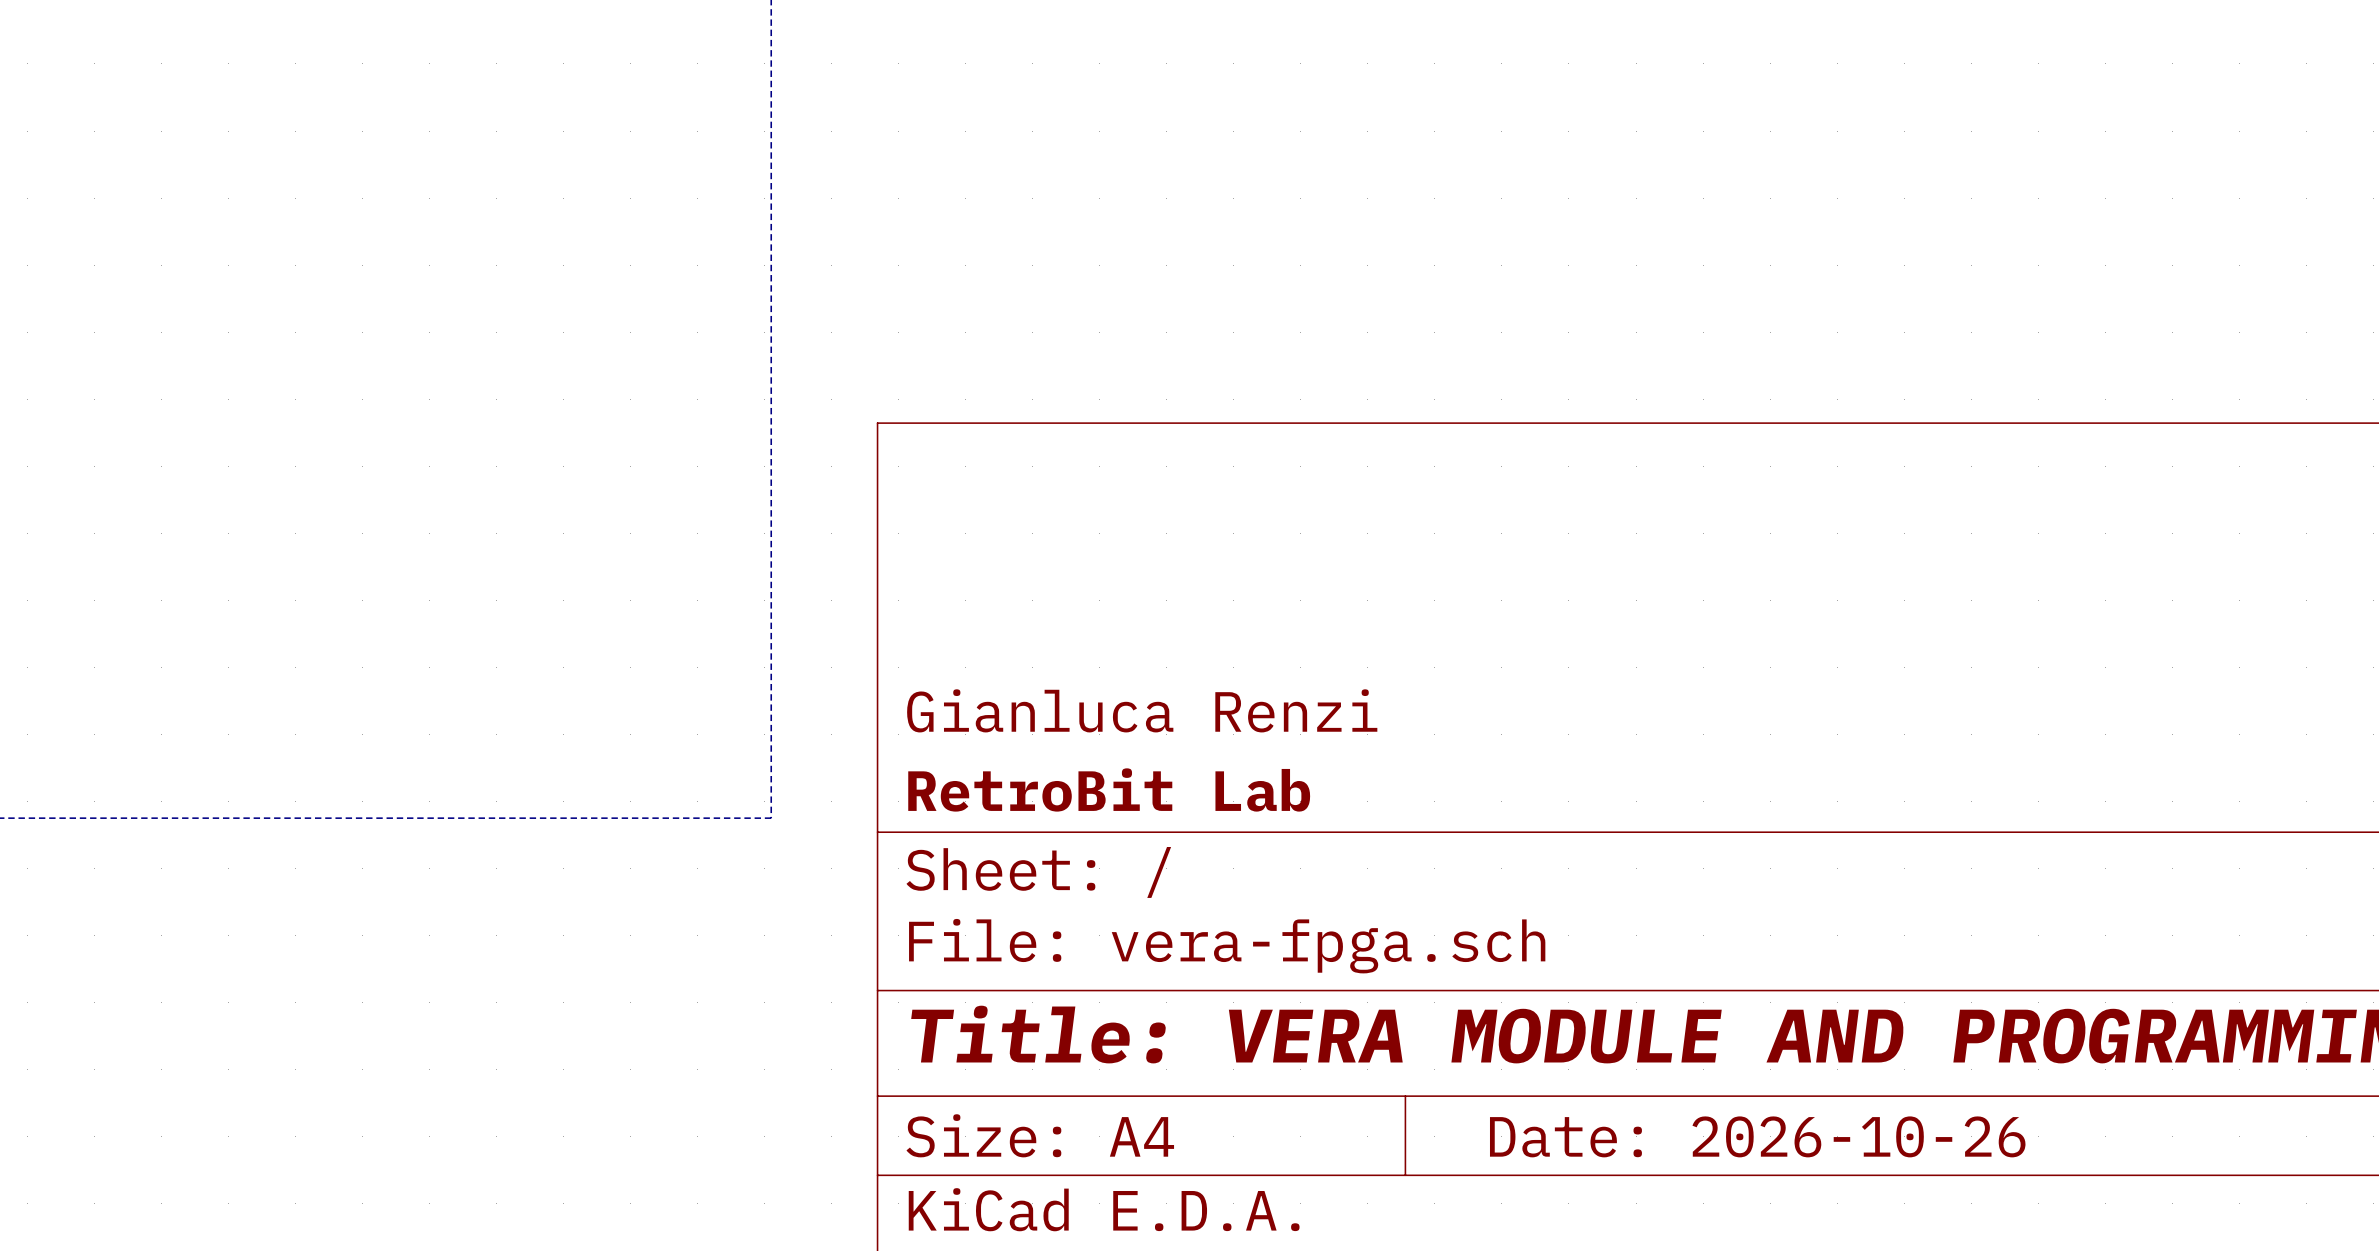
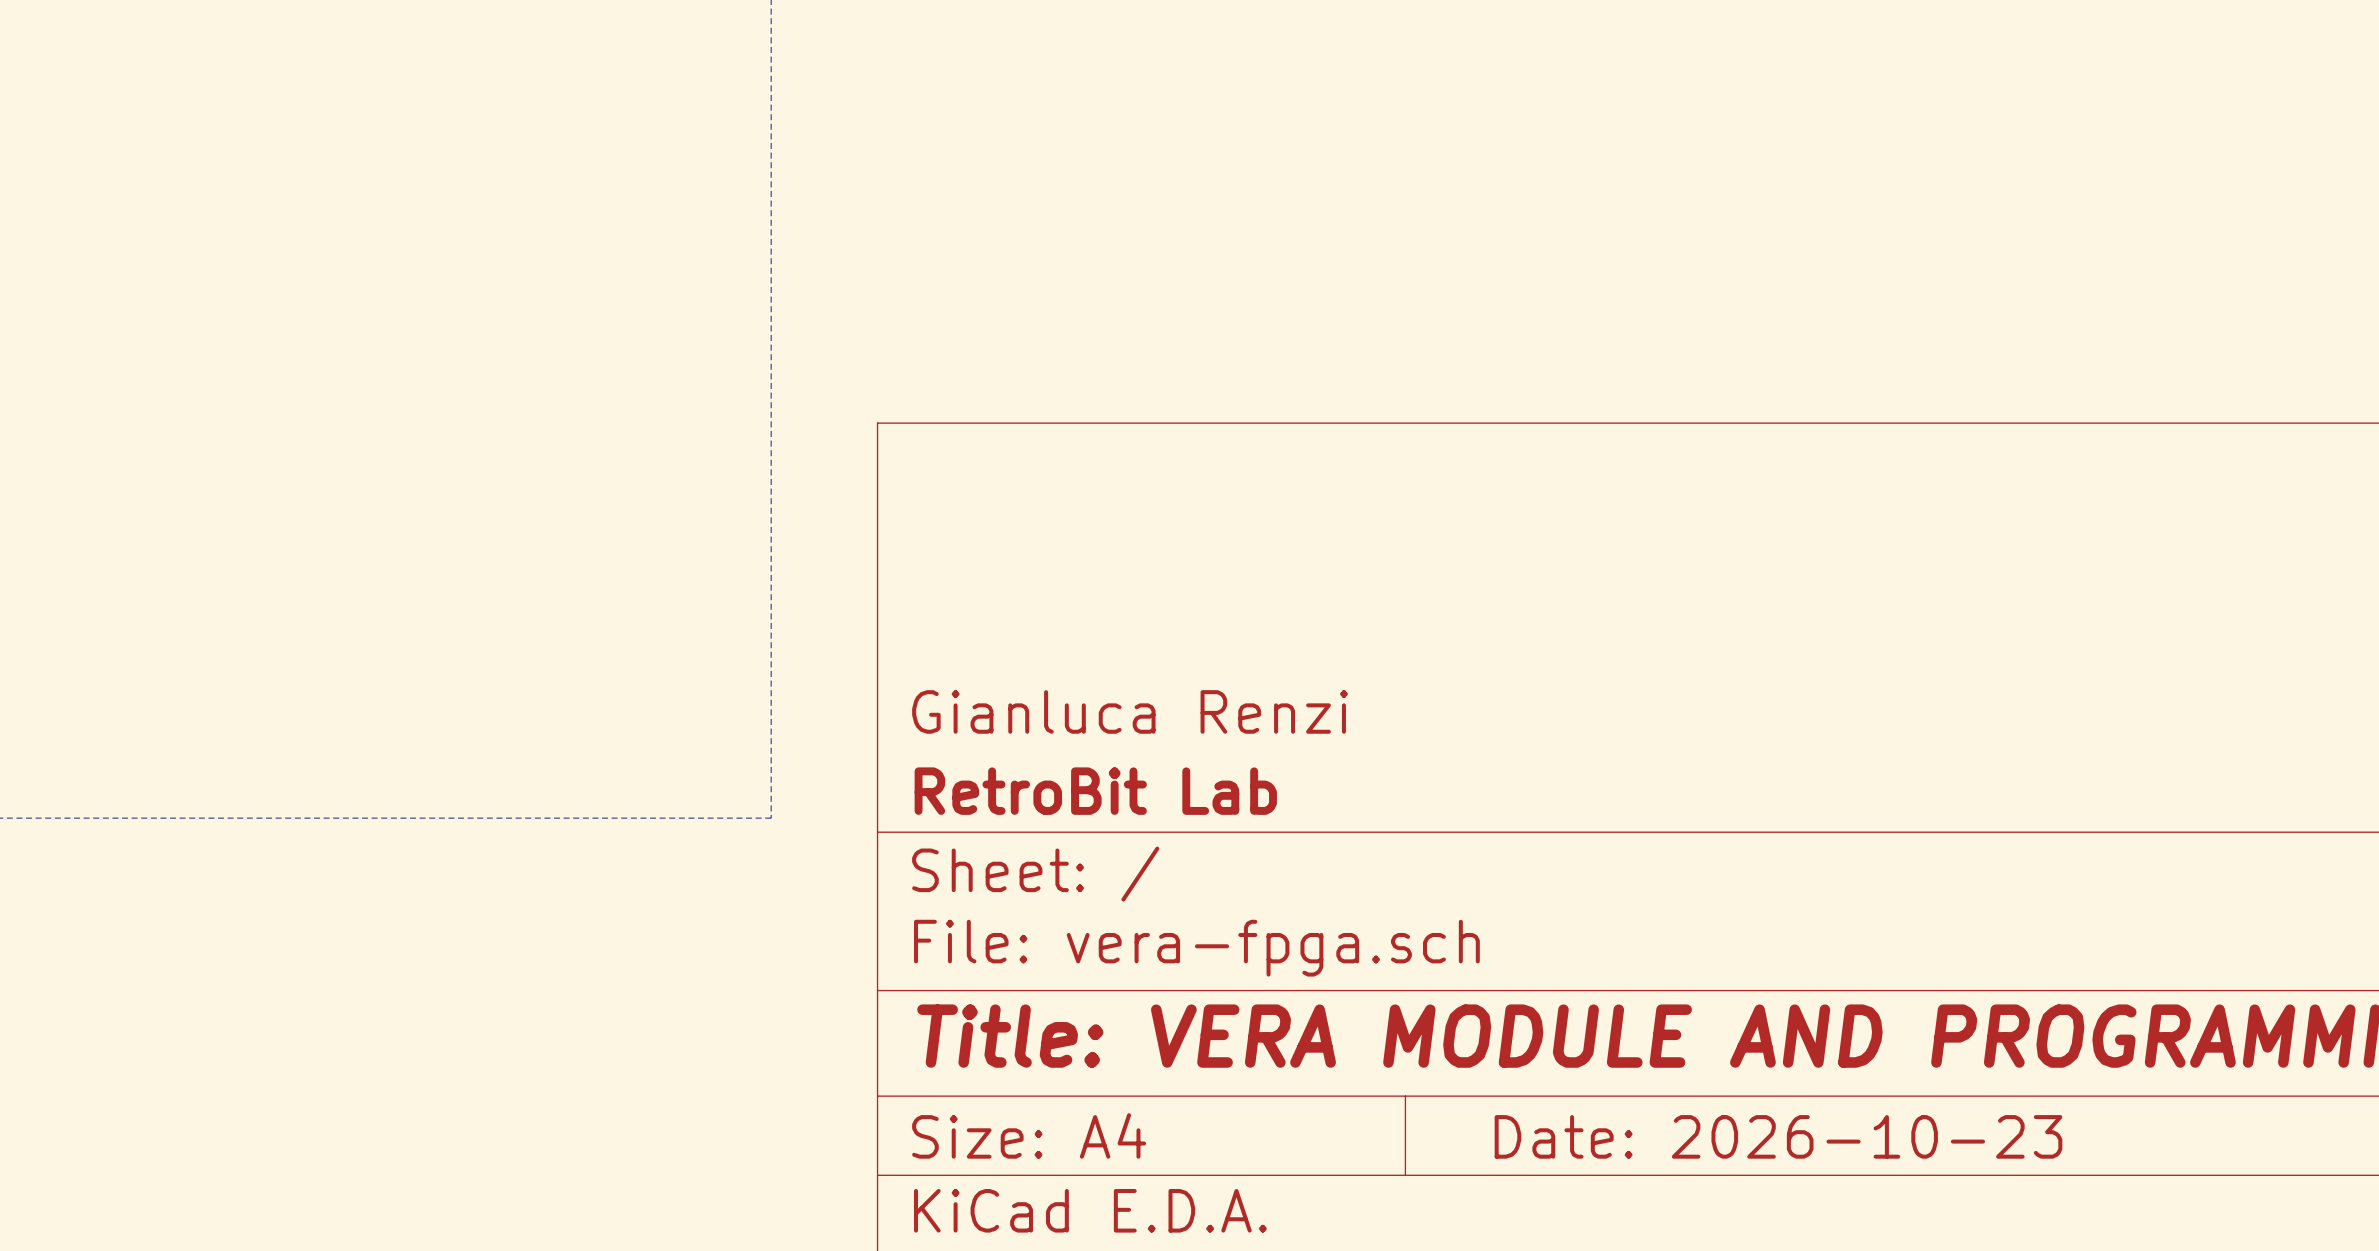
title block: Date: 2026-10-26 (1757, 1136) -> Date: 2026-10-23 (1778, 1136)

